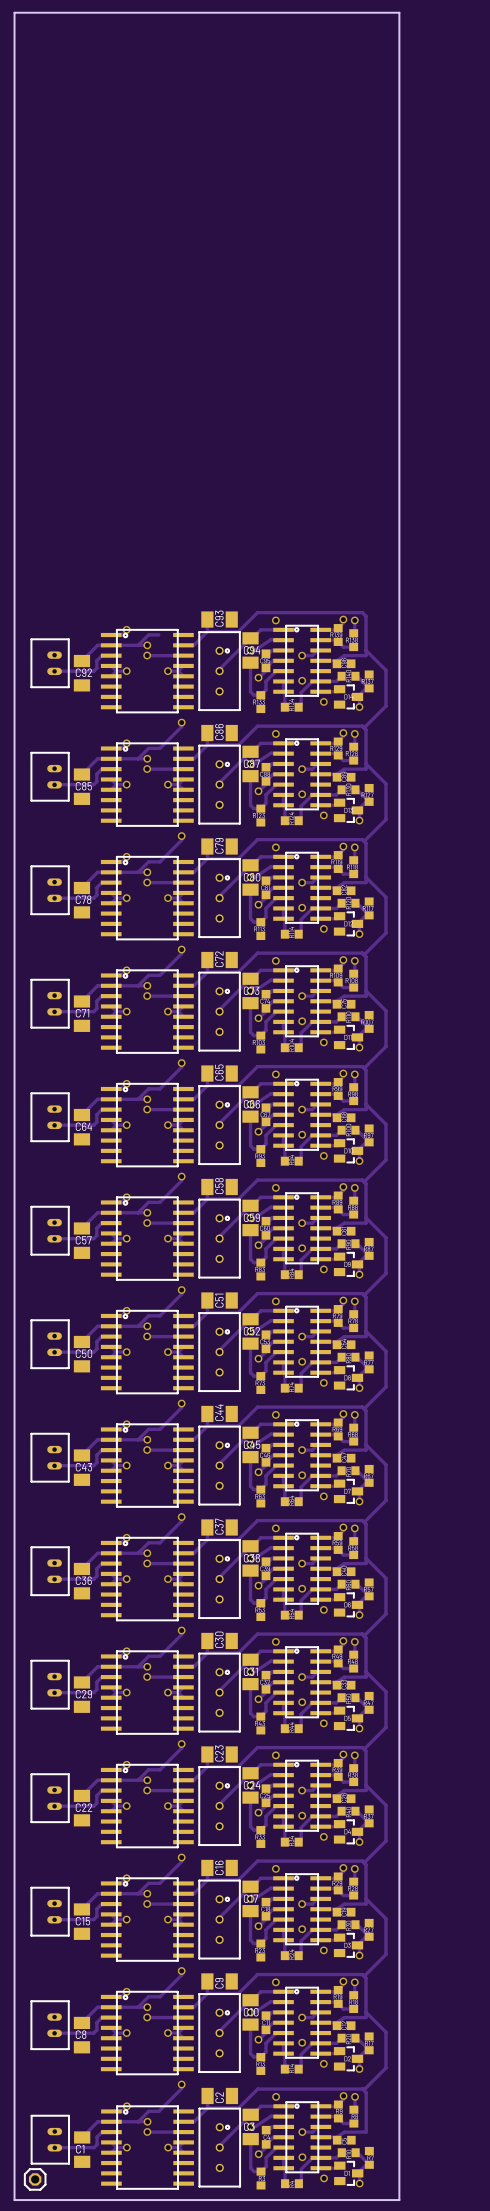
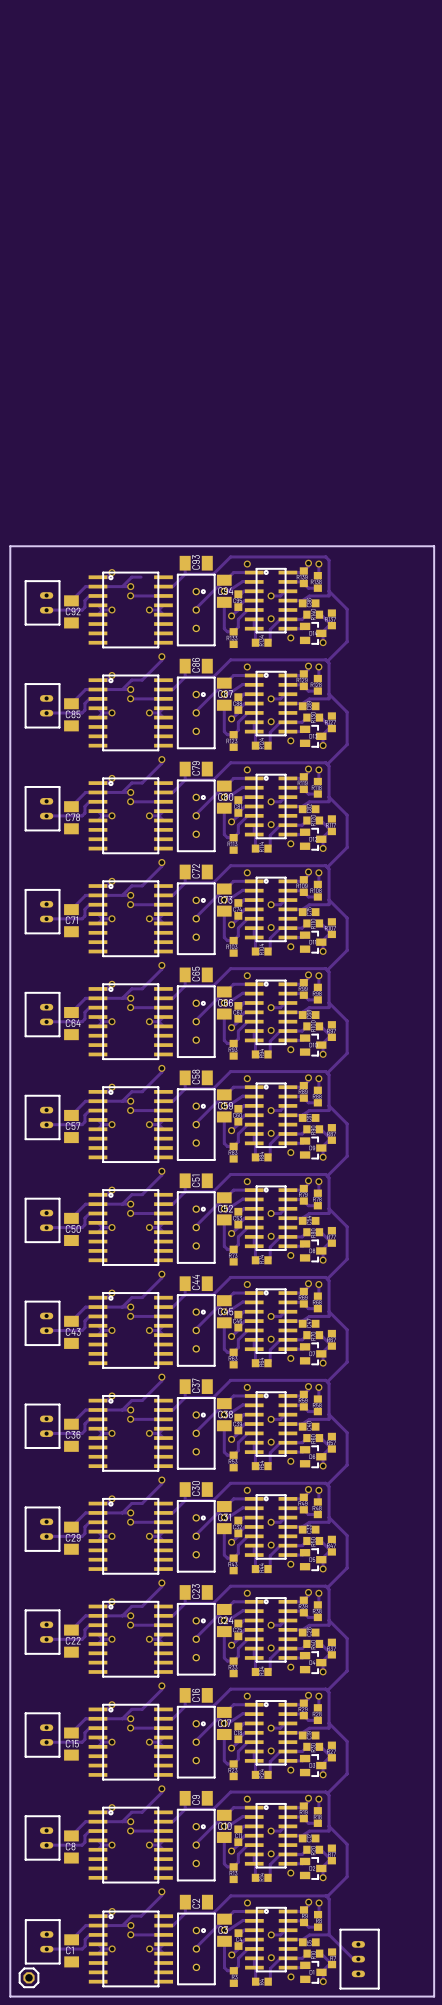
board edge: (14, 600) (14, 12) (399, 12) (399, 2200) -> (10, 546) (434, 546) (434, 1996) (359, 1996)
track: none -> (329, 1934) (353, 1959) (358, 1959)
part: none -> (359, 1959)

